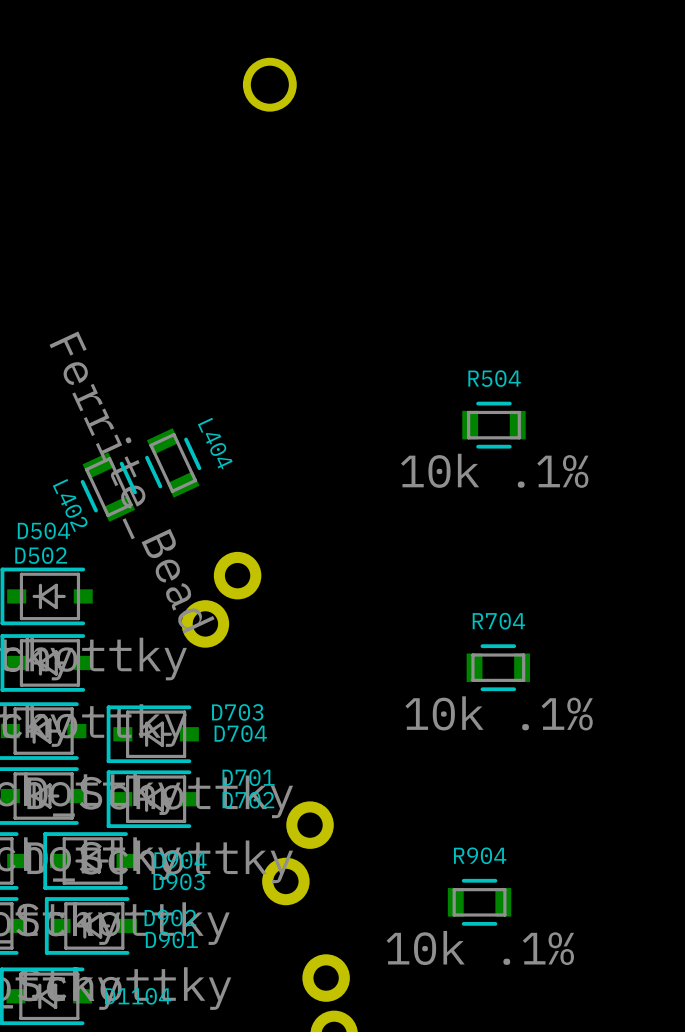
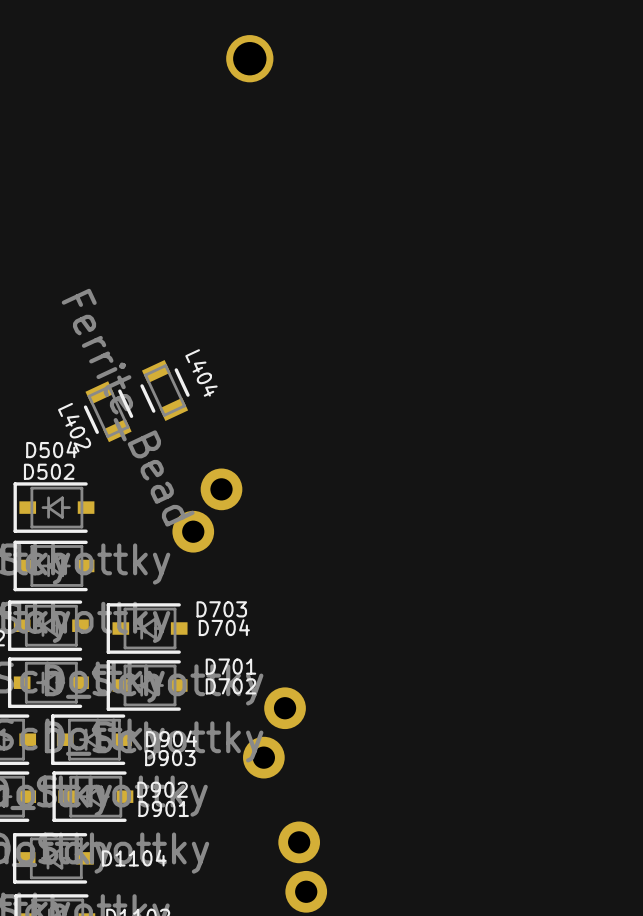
R504: 10k .1% (493, 425) -> none
R704: 10k .1% (498, 667) -> none
R904: 10k .1% (479, 902) -> none

